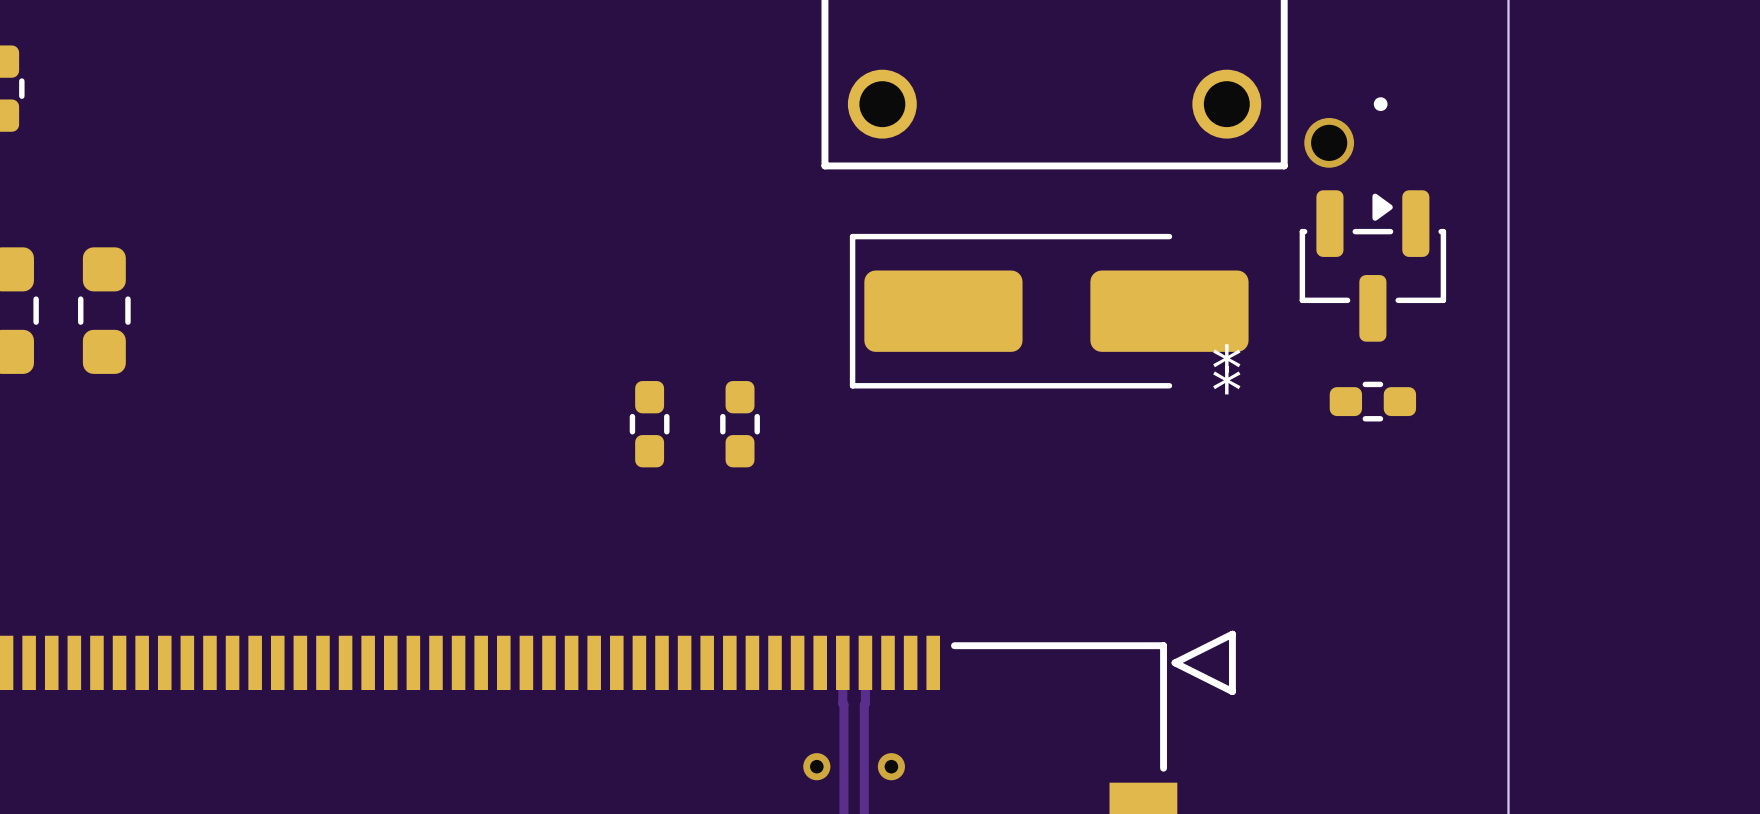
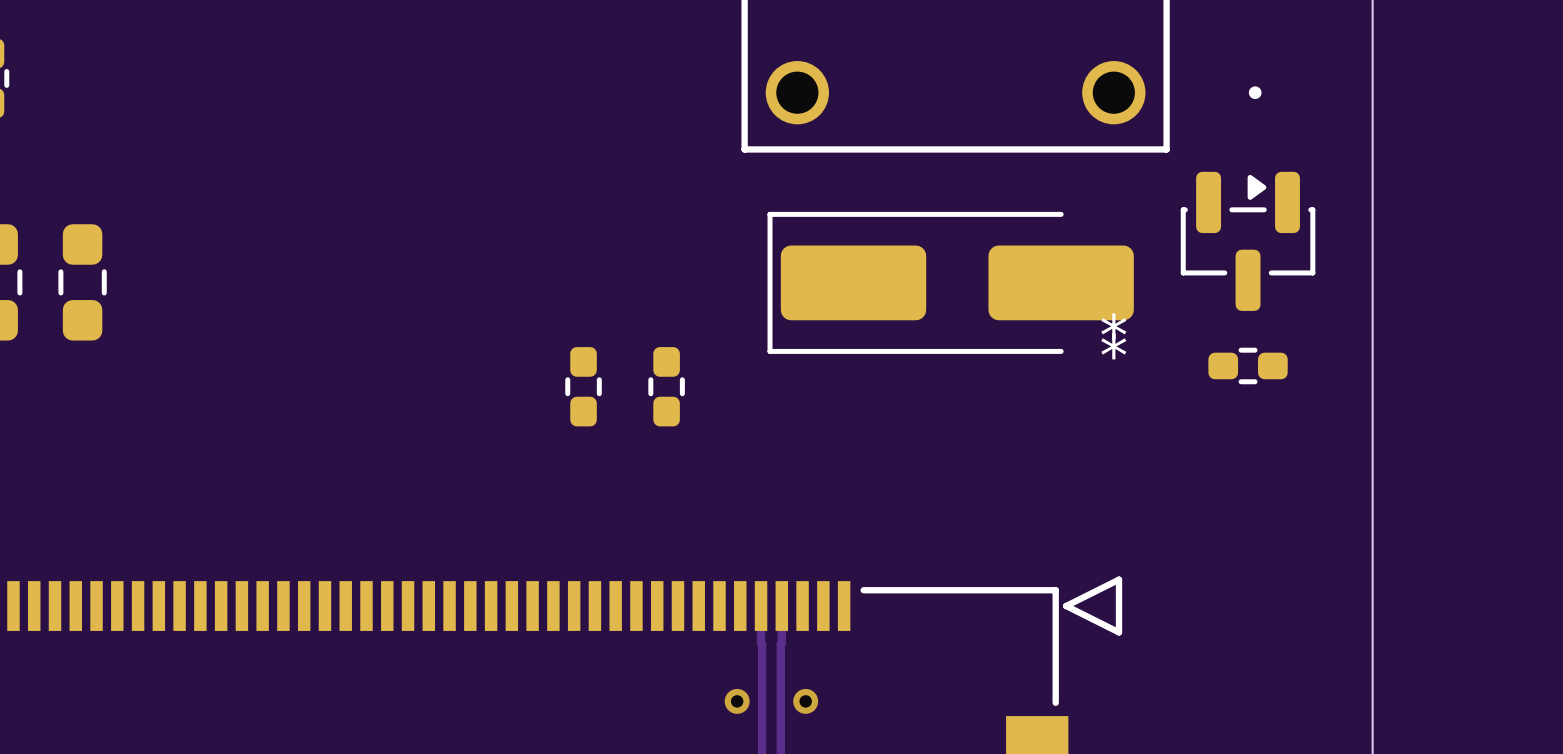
via: (1329, 142) -> none

